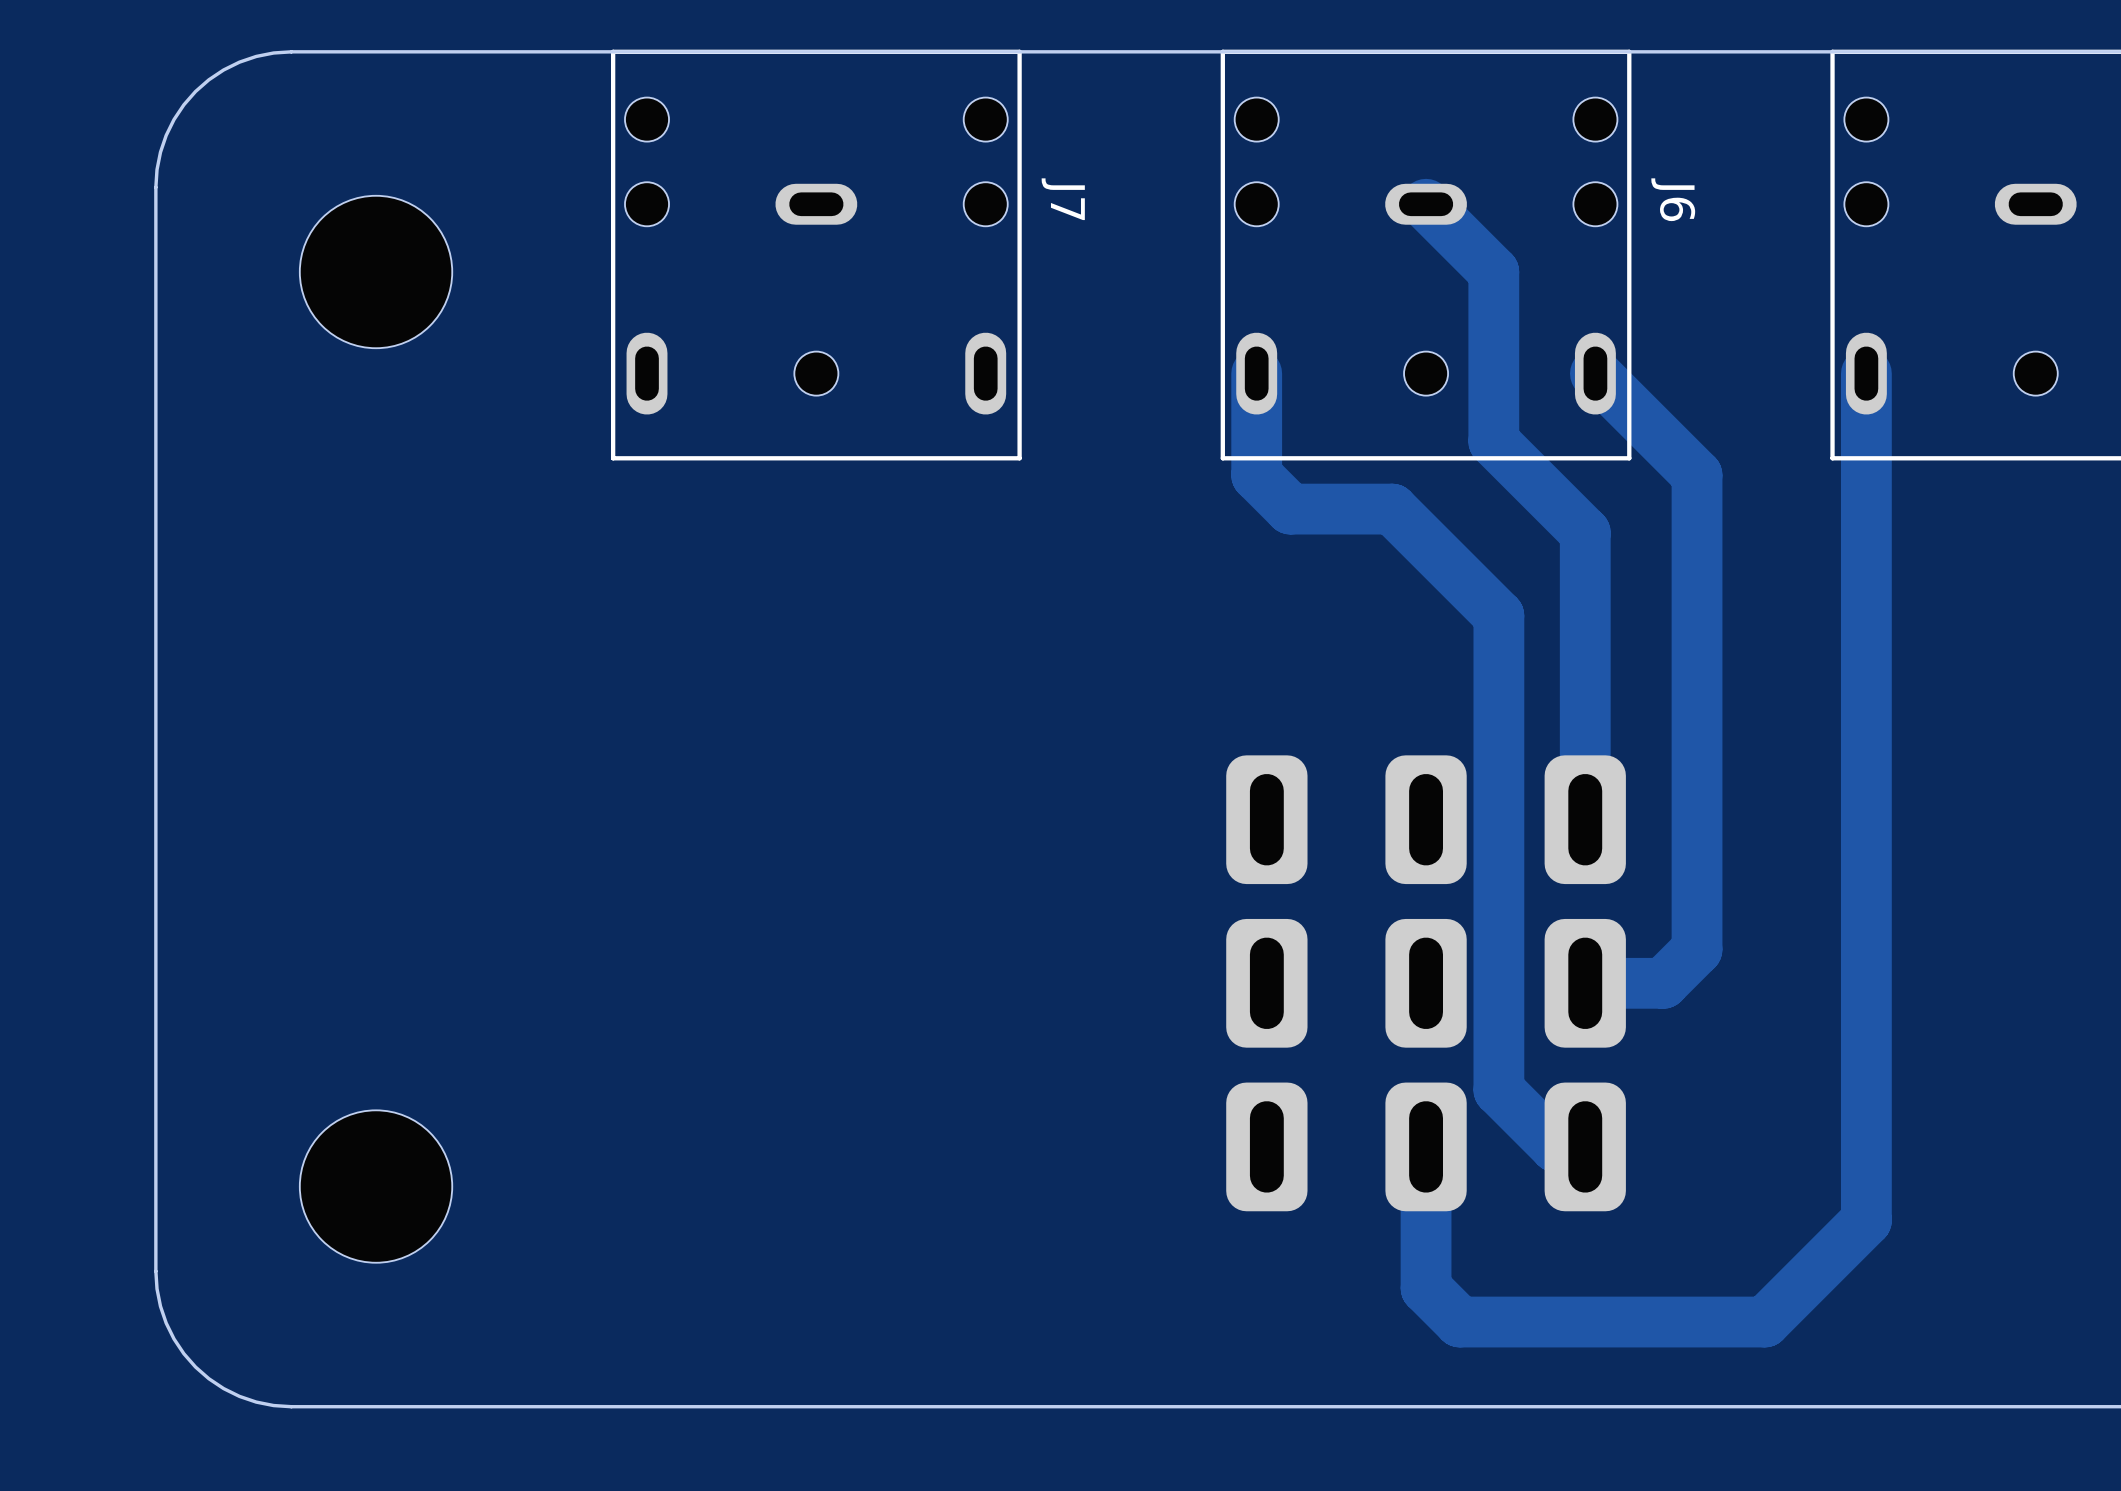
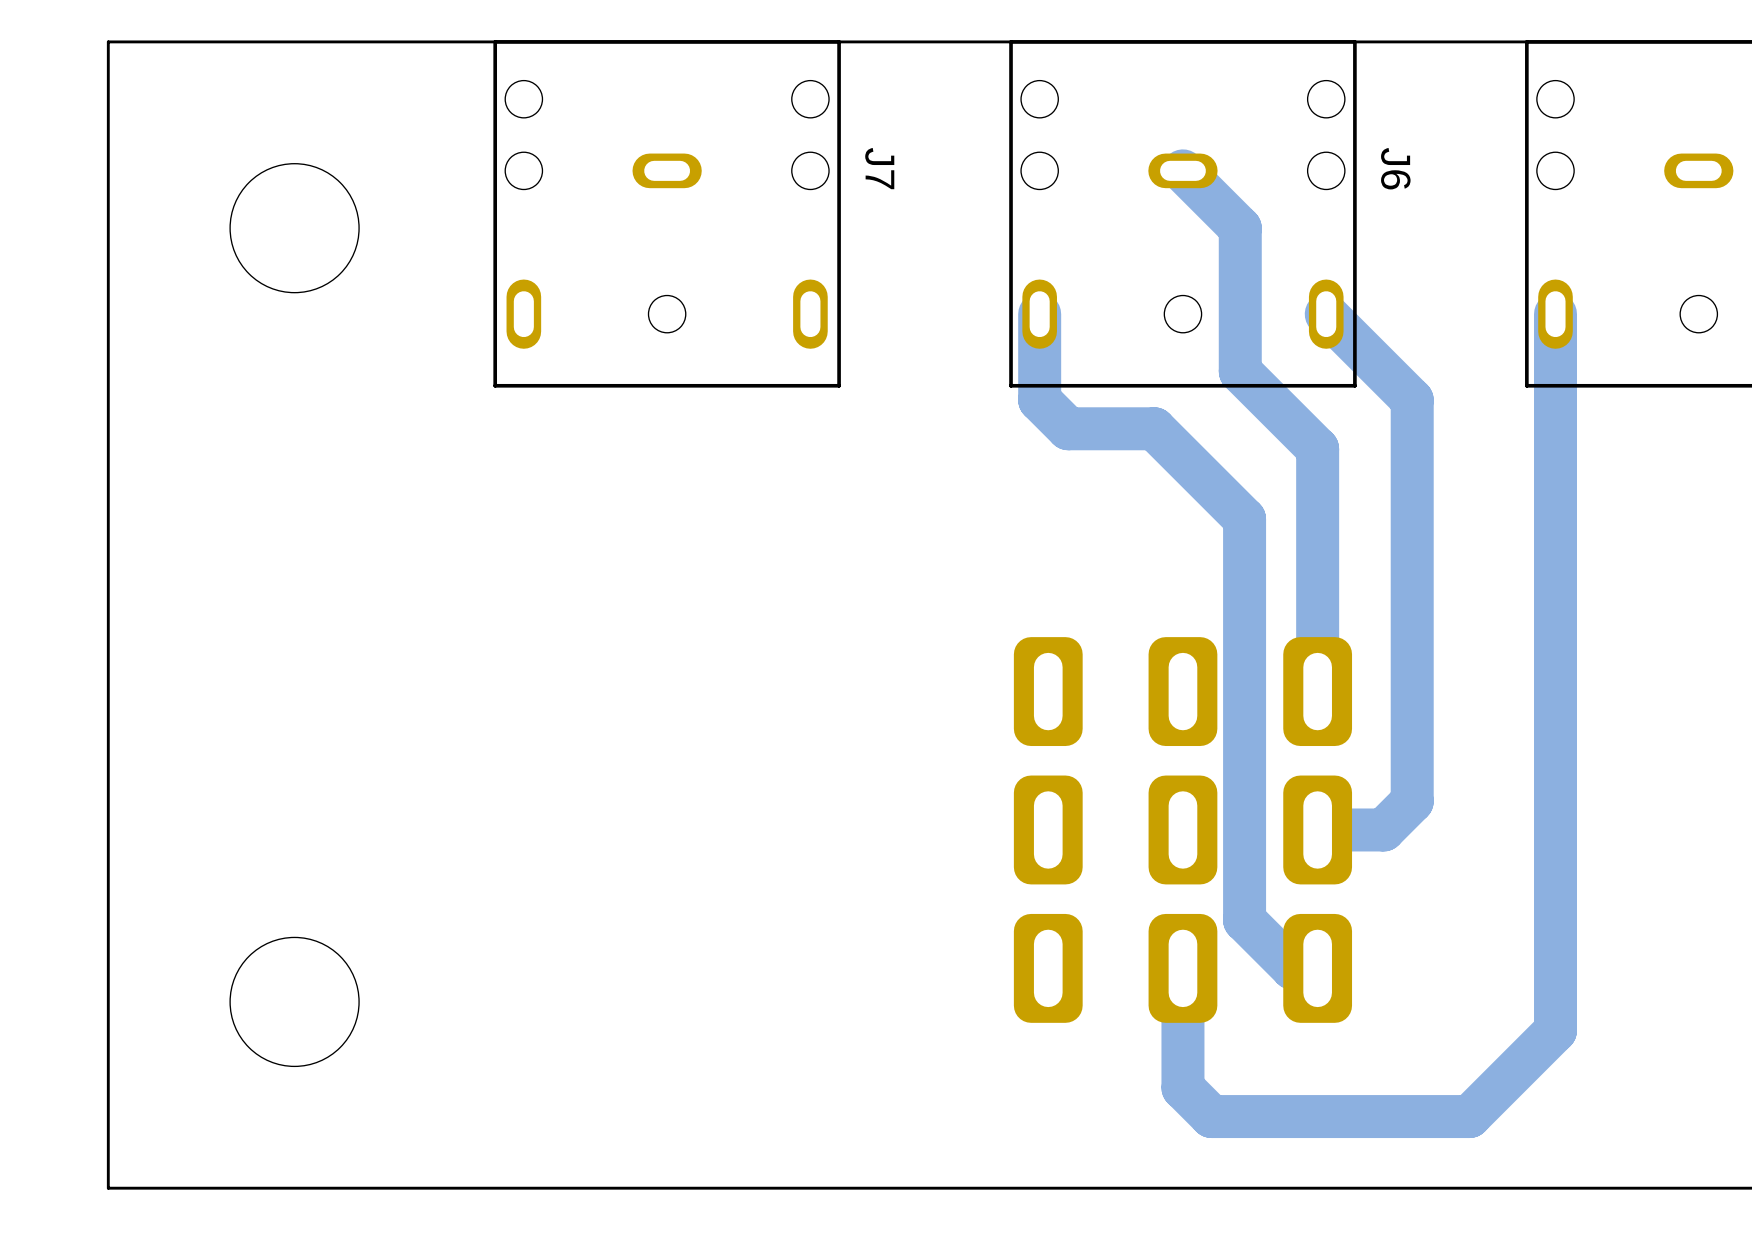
board edge: (291, 51) (256, 56) (239, 62) (223, 69) (195, 91) (174, 119) (166, 135) (160, 152) (155, 187) -> (222, 41) (108, 41) (108, 156)
board edge: (155, 1271) (160, 1306) (166, 1323) (174, 1338) (195, 1367) (223, 1388) (239, 1396) (256, 1402) (291, 1406) -> (108, 1073) (108, 1188) (222, 1188)

